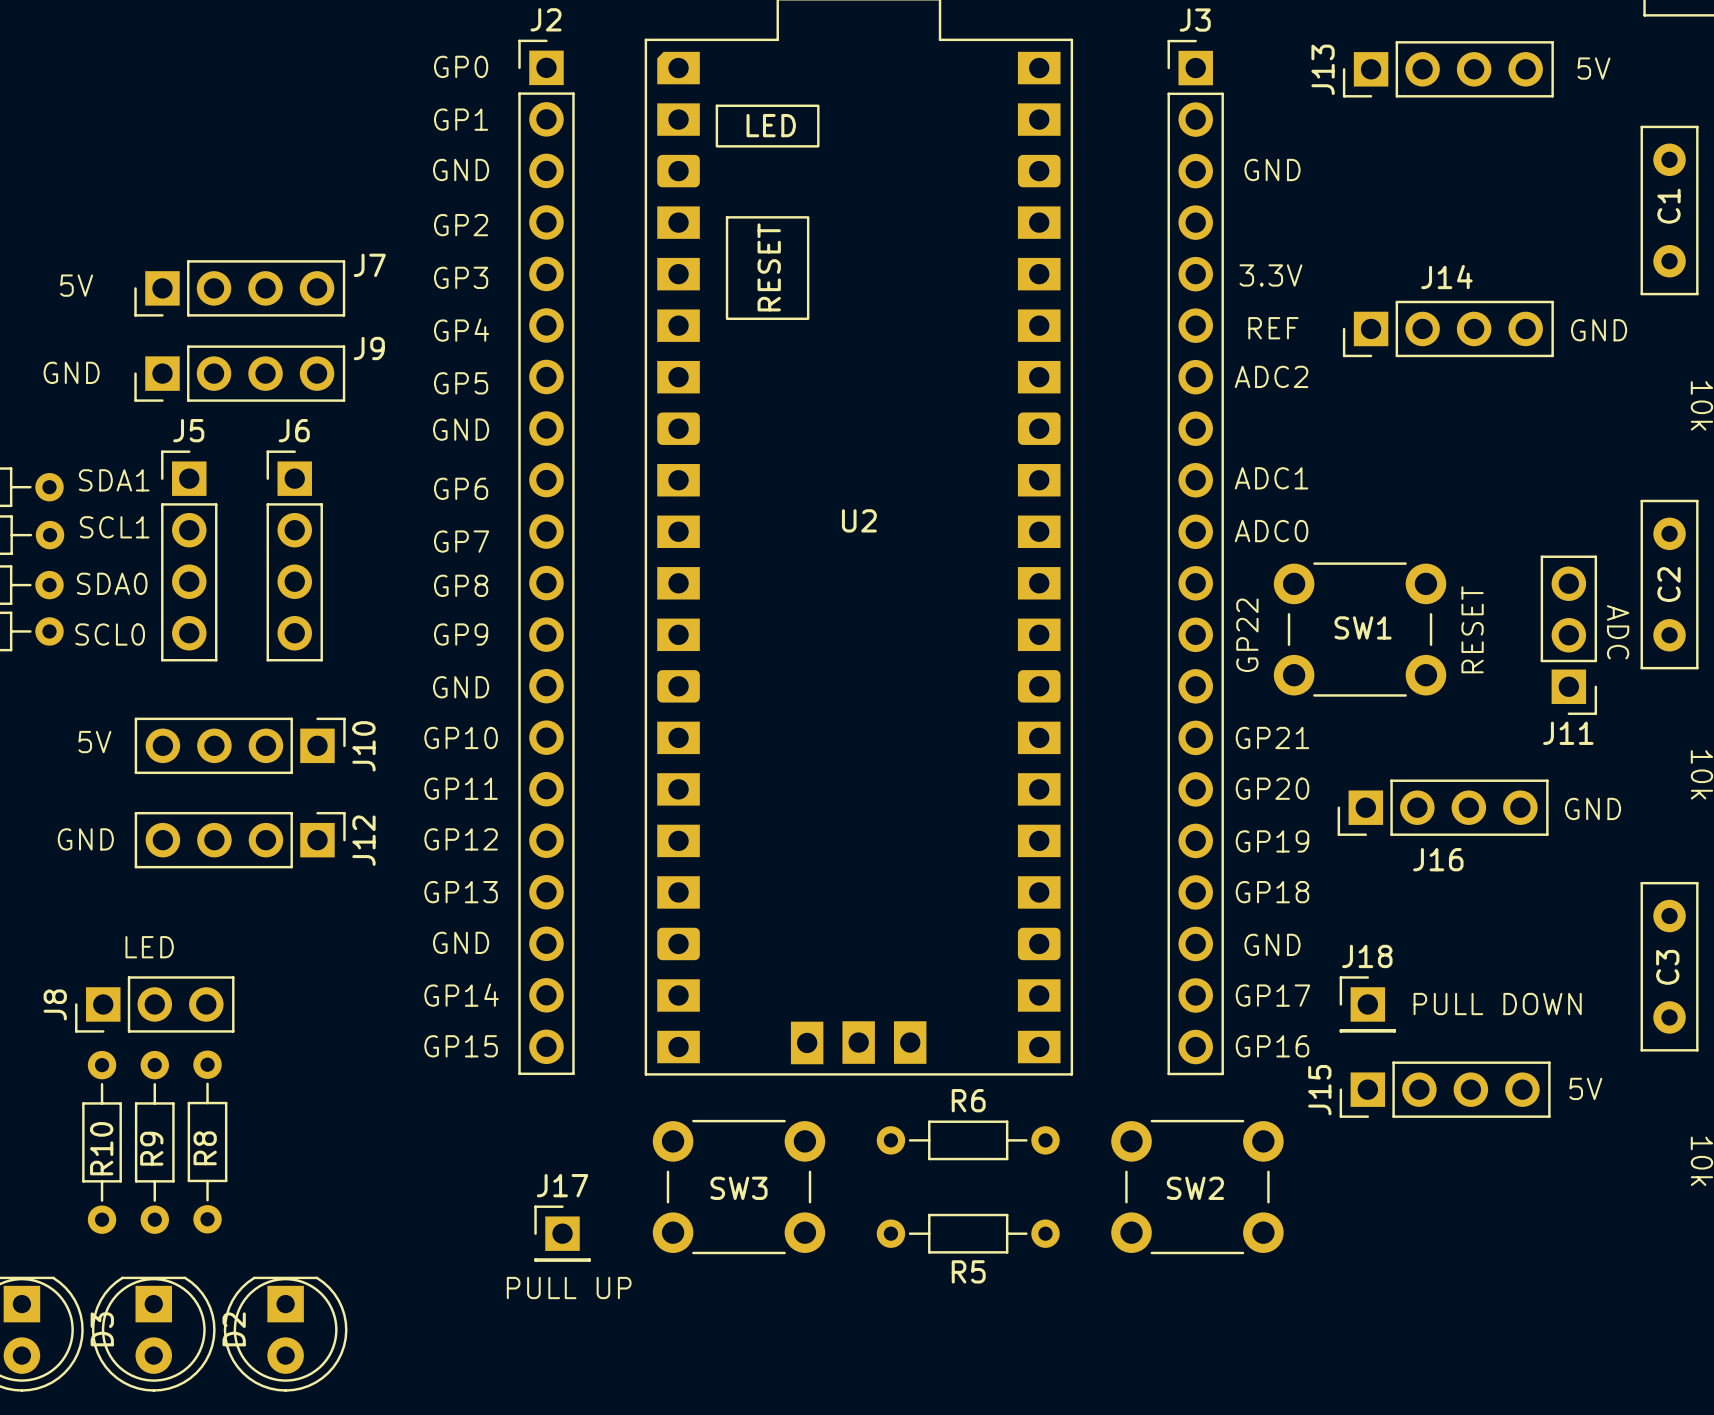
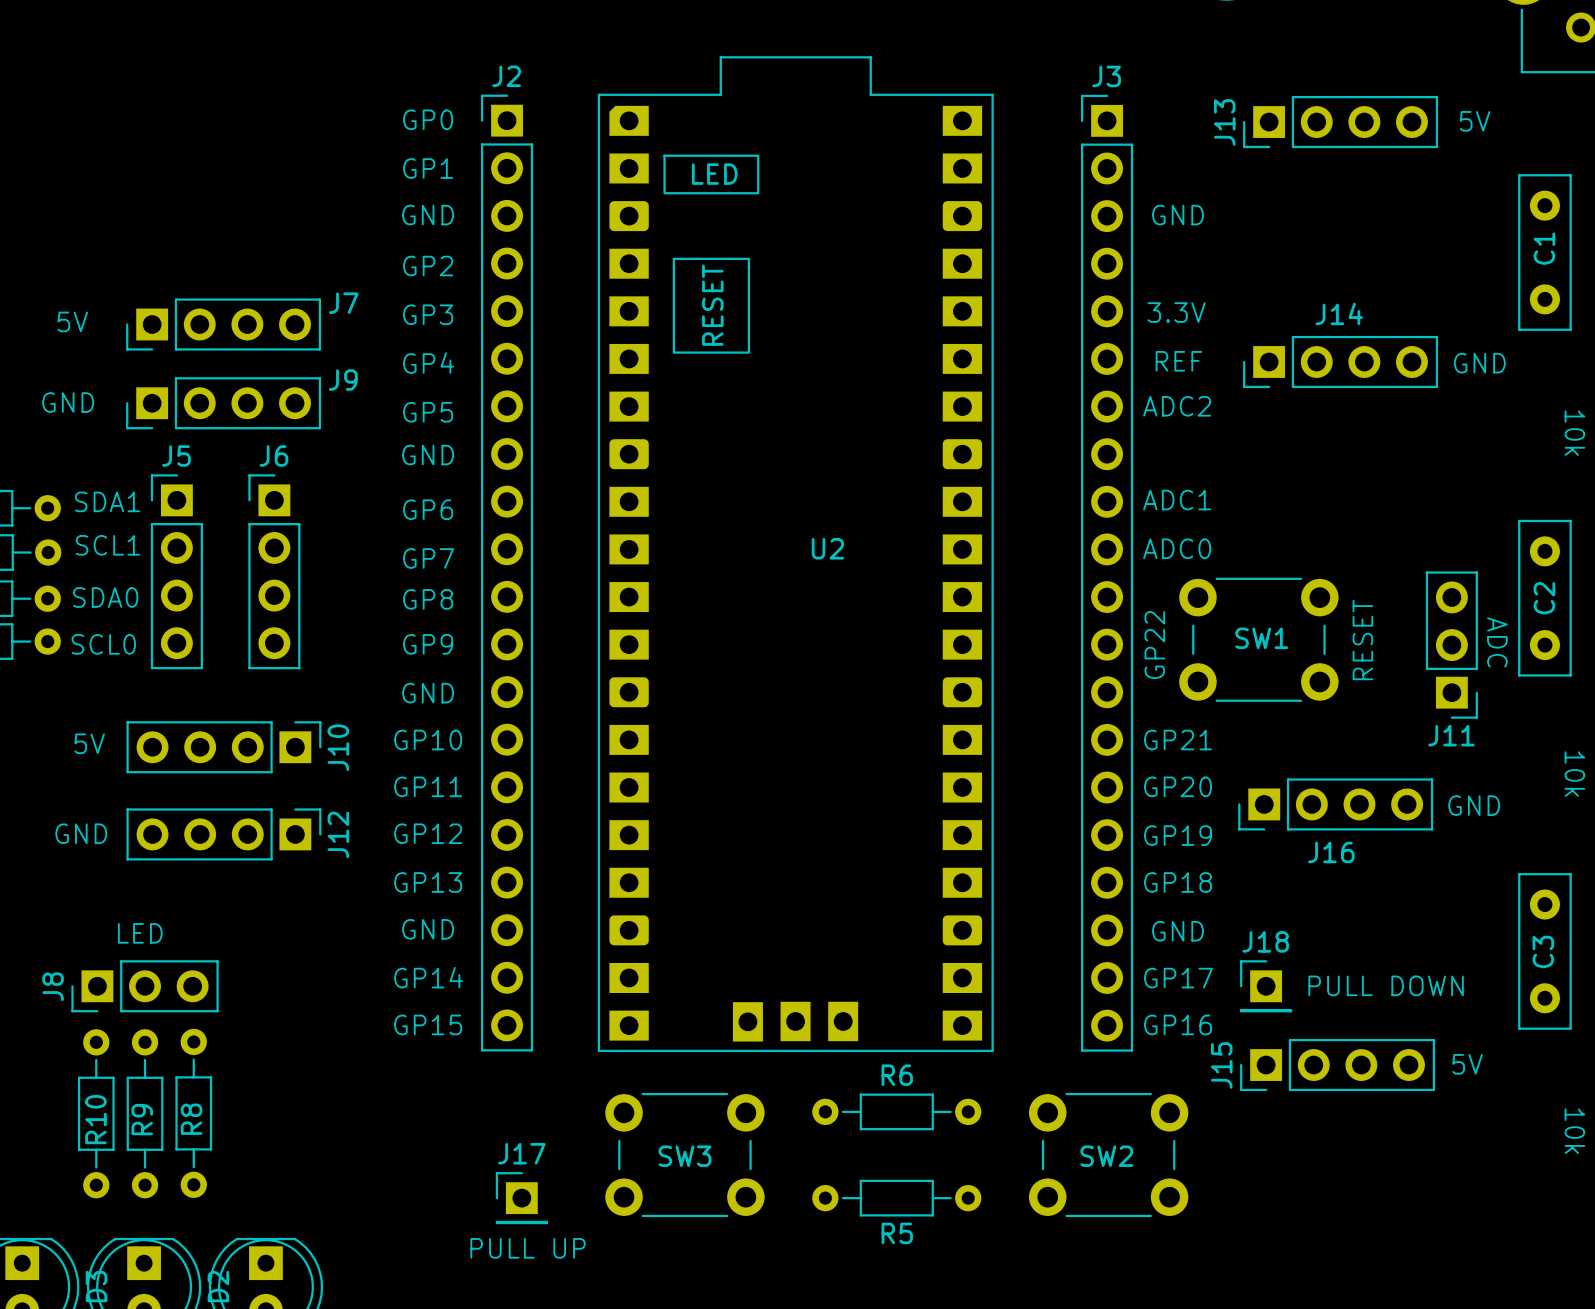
U2 name position: U2 (859, 520) -> U2 (827, 548)

